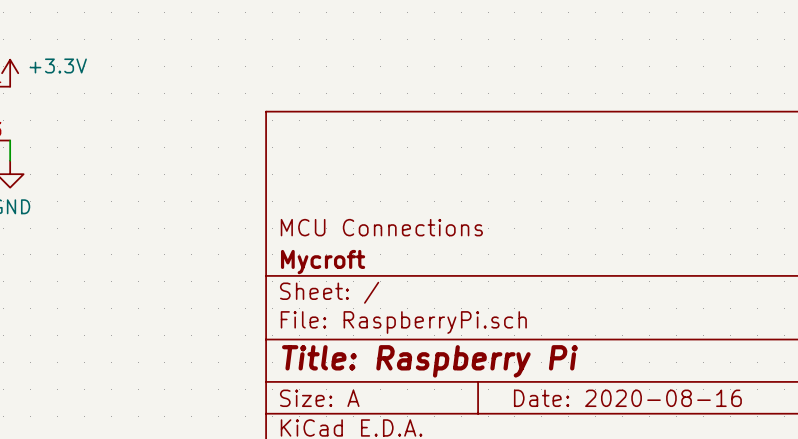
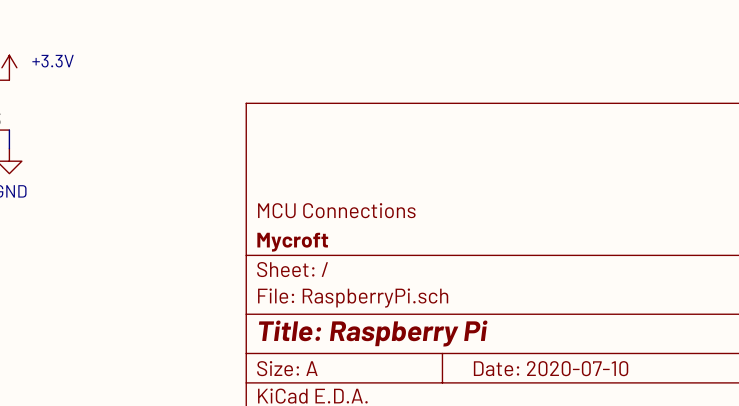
title block: Date: 2020-08-16 (627, 398) -> Date: 2020-07-10 (551, 368)

